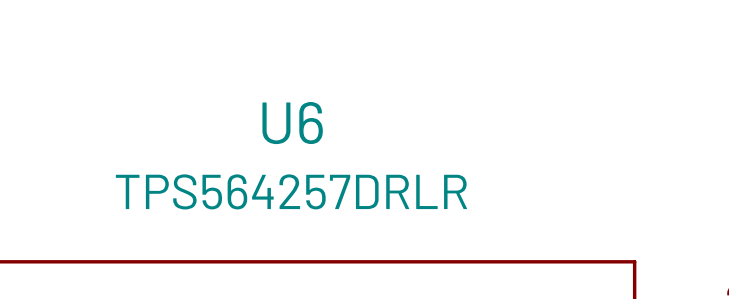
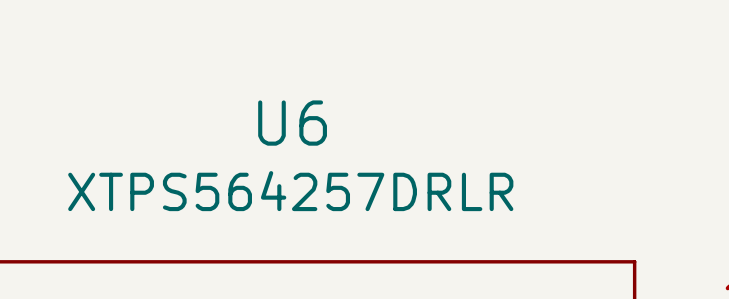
U6 value: TPS564257DRLR (291, 191) -> XTPS564257DRLR (290, 191)

